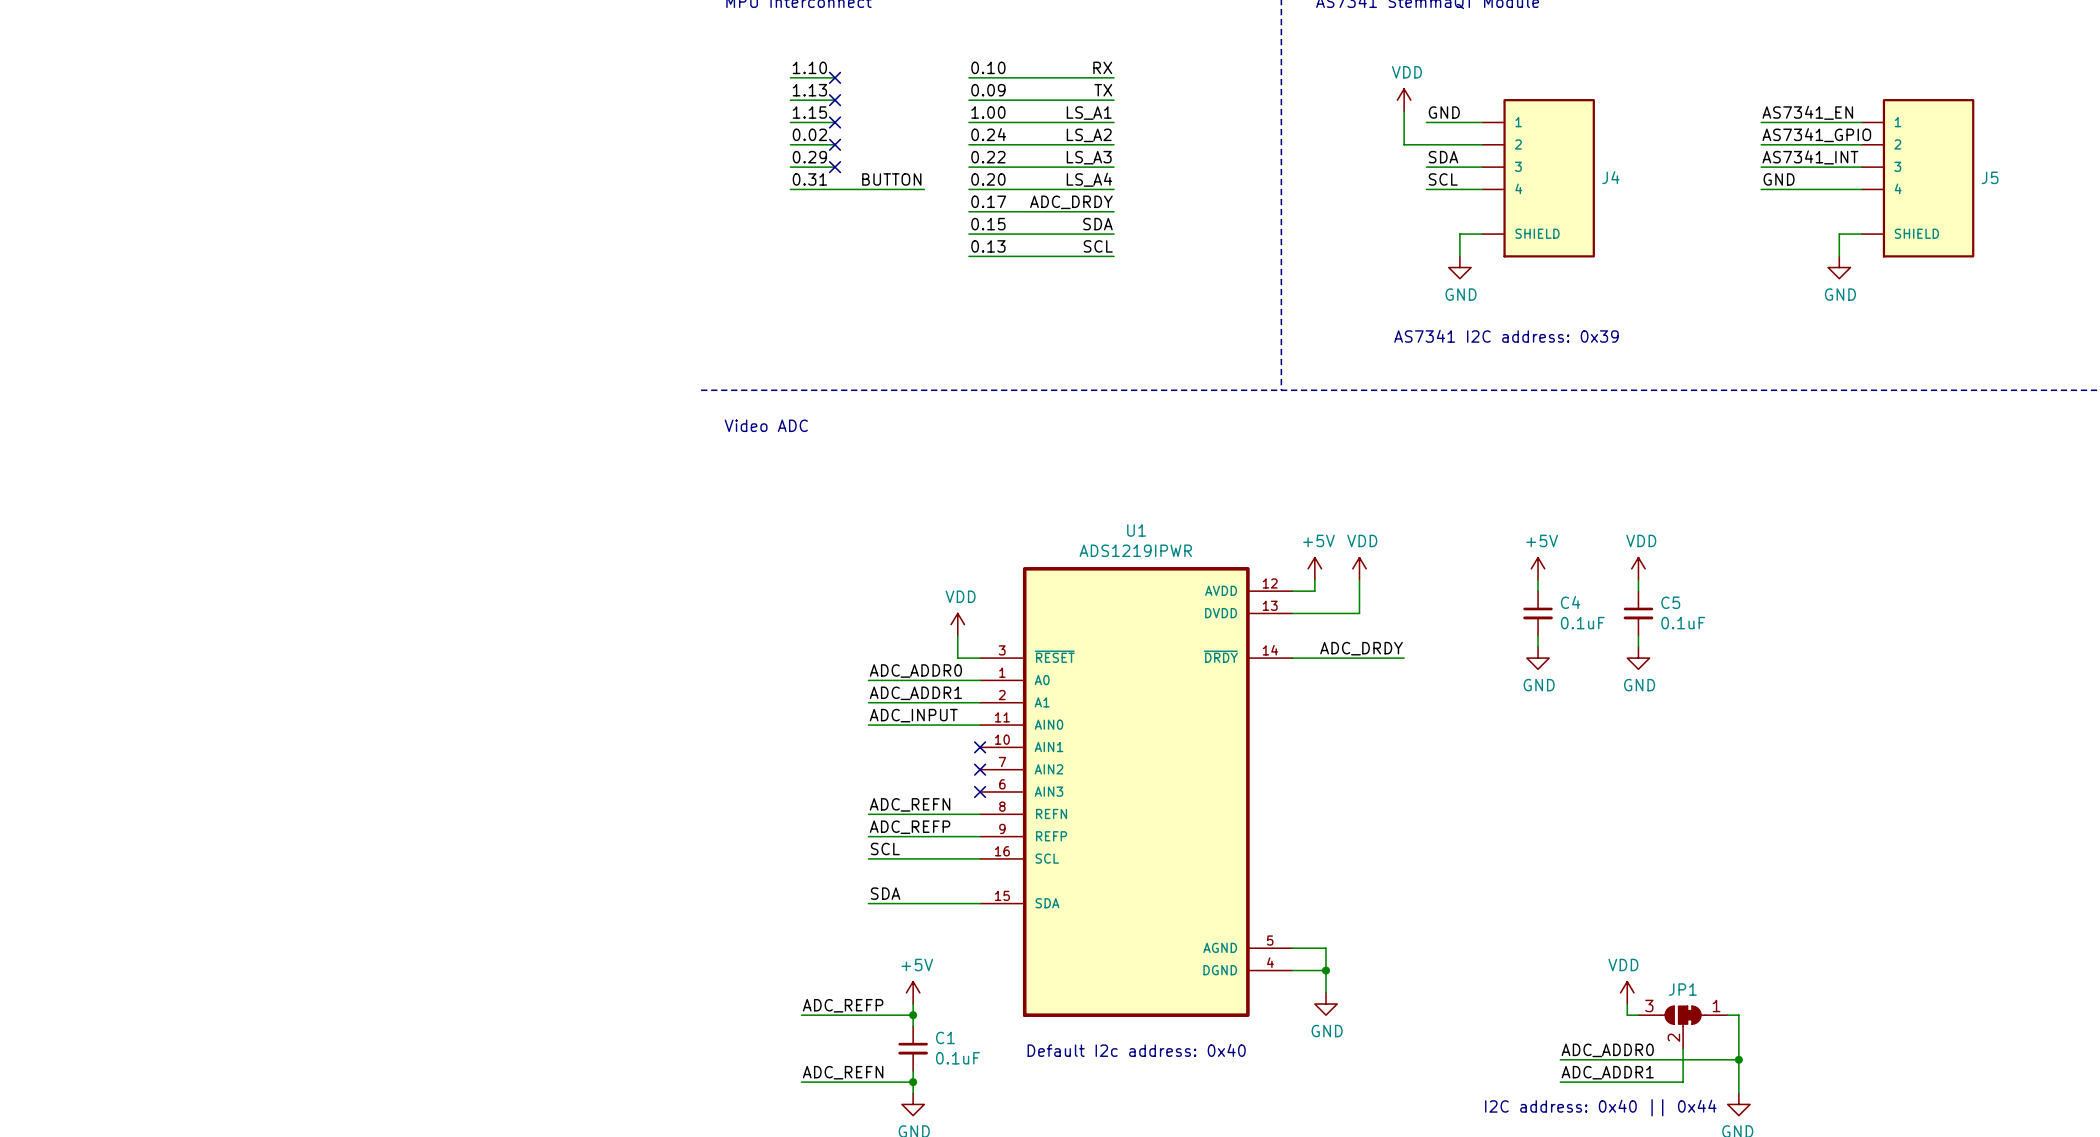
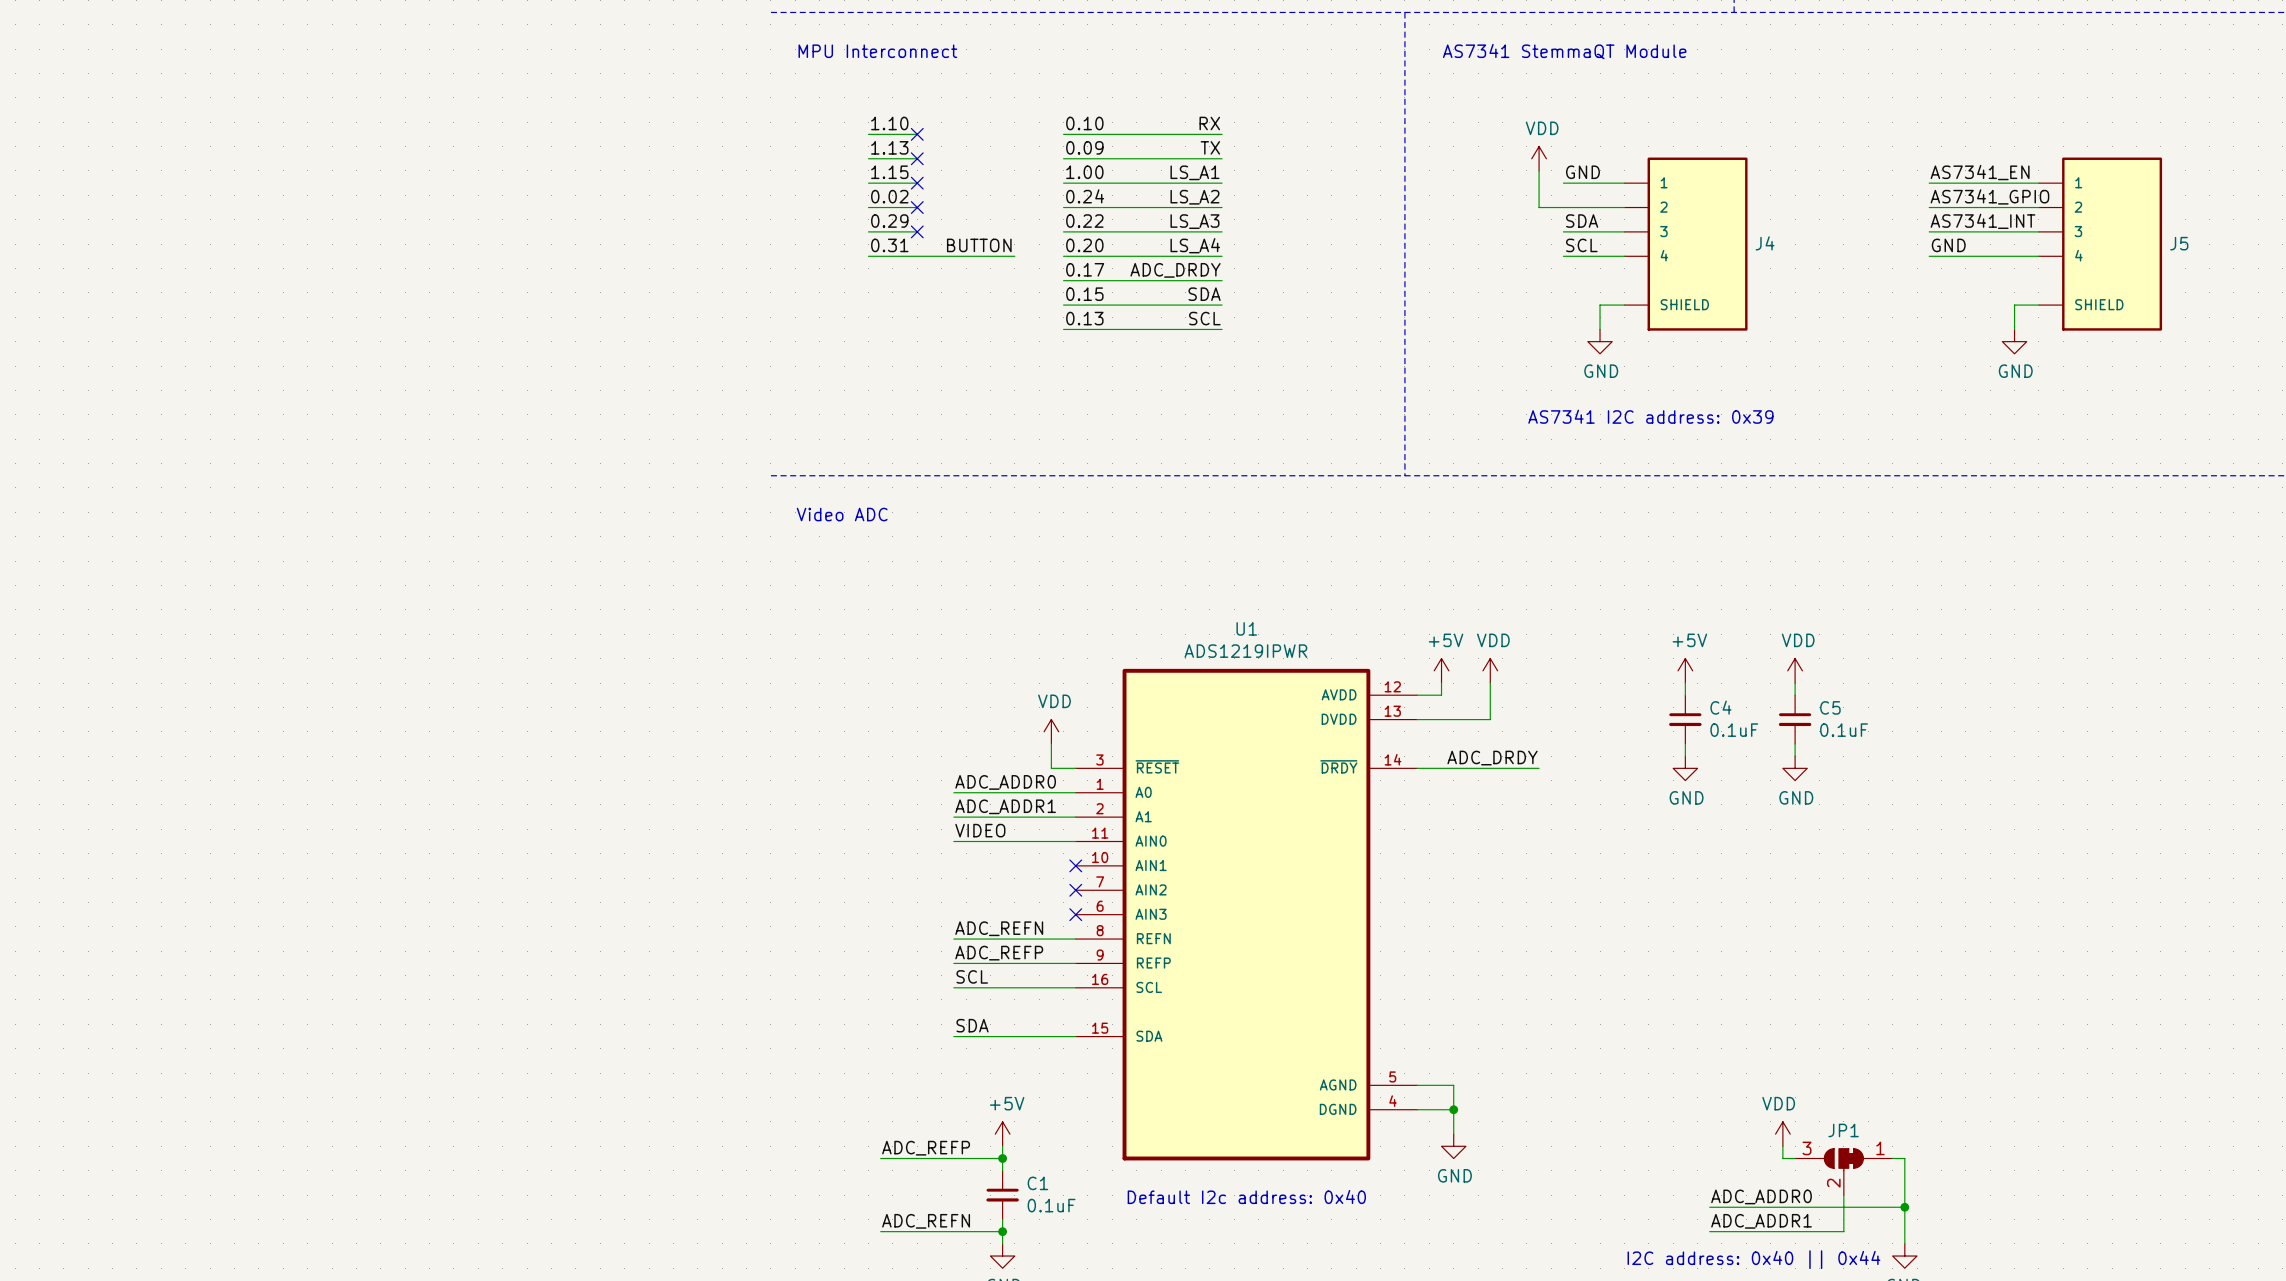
label: ADC_INPUT (913, 715) -> VIDEO (980, 830)

